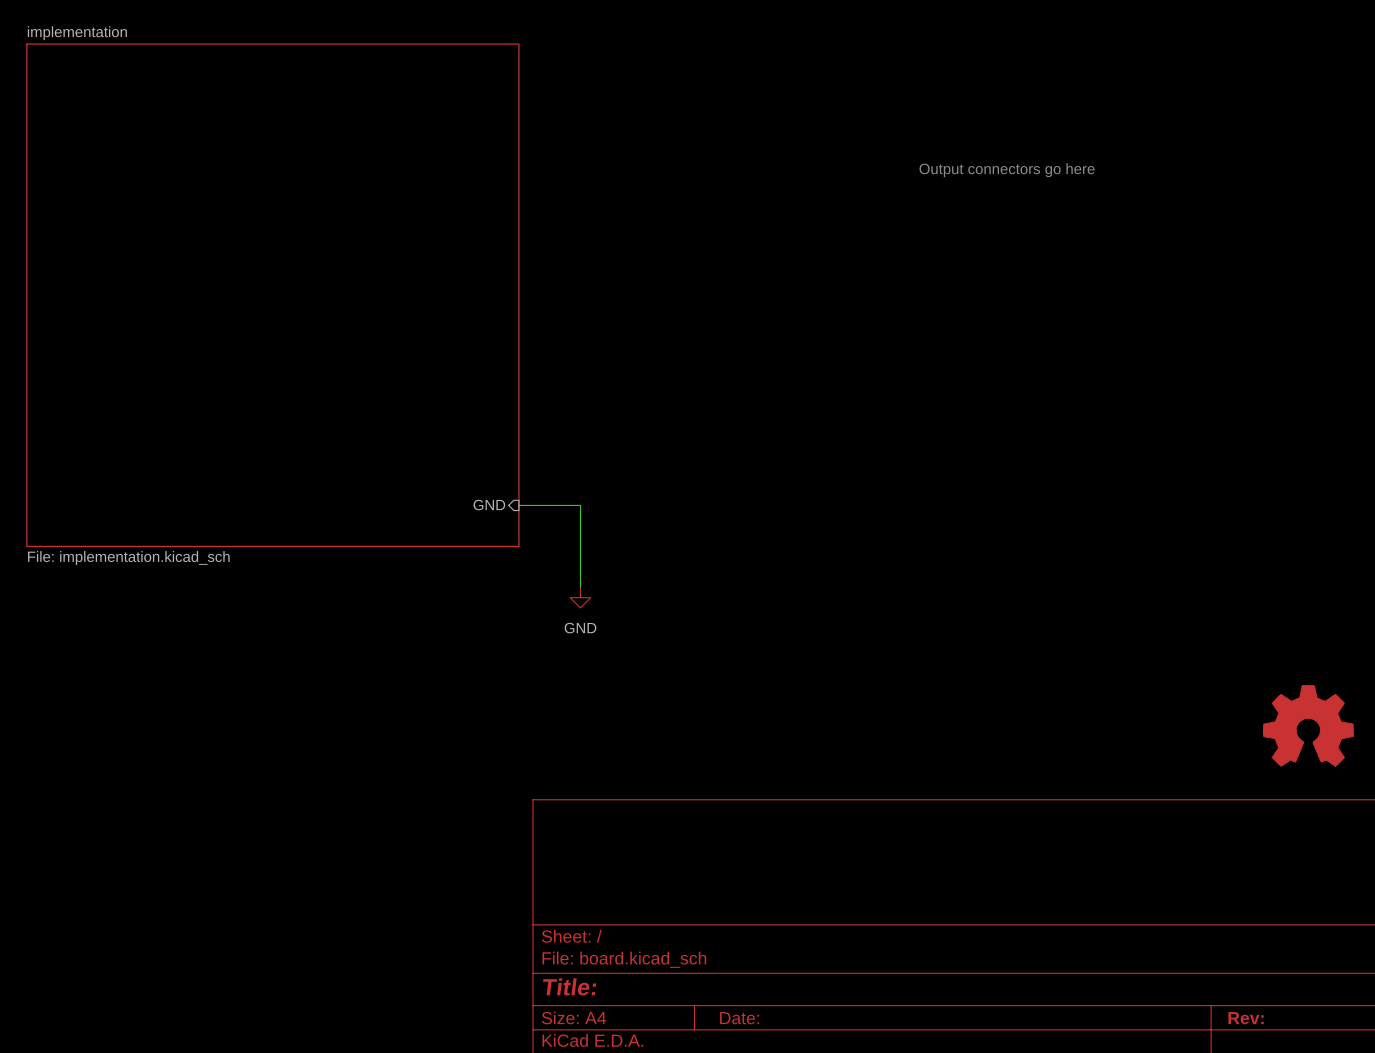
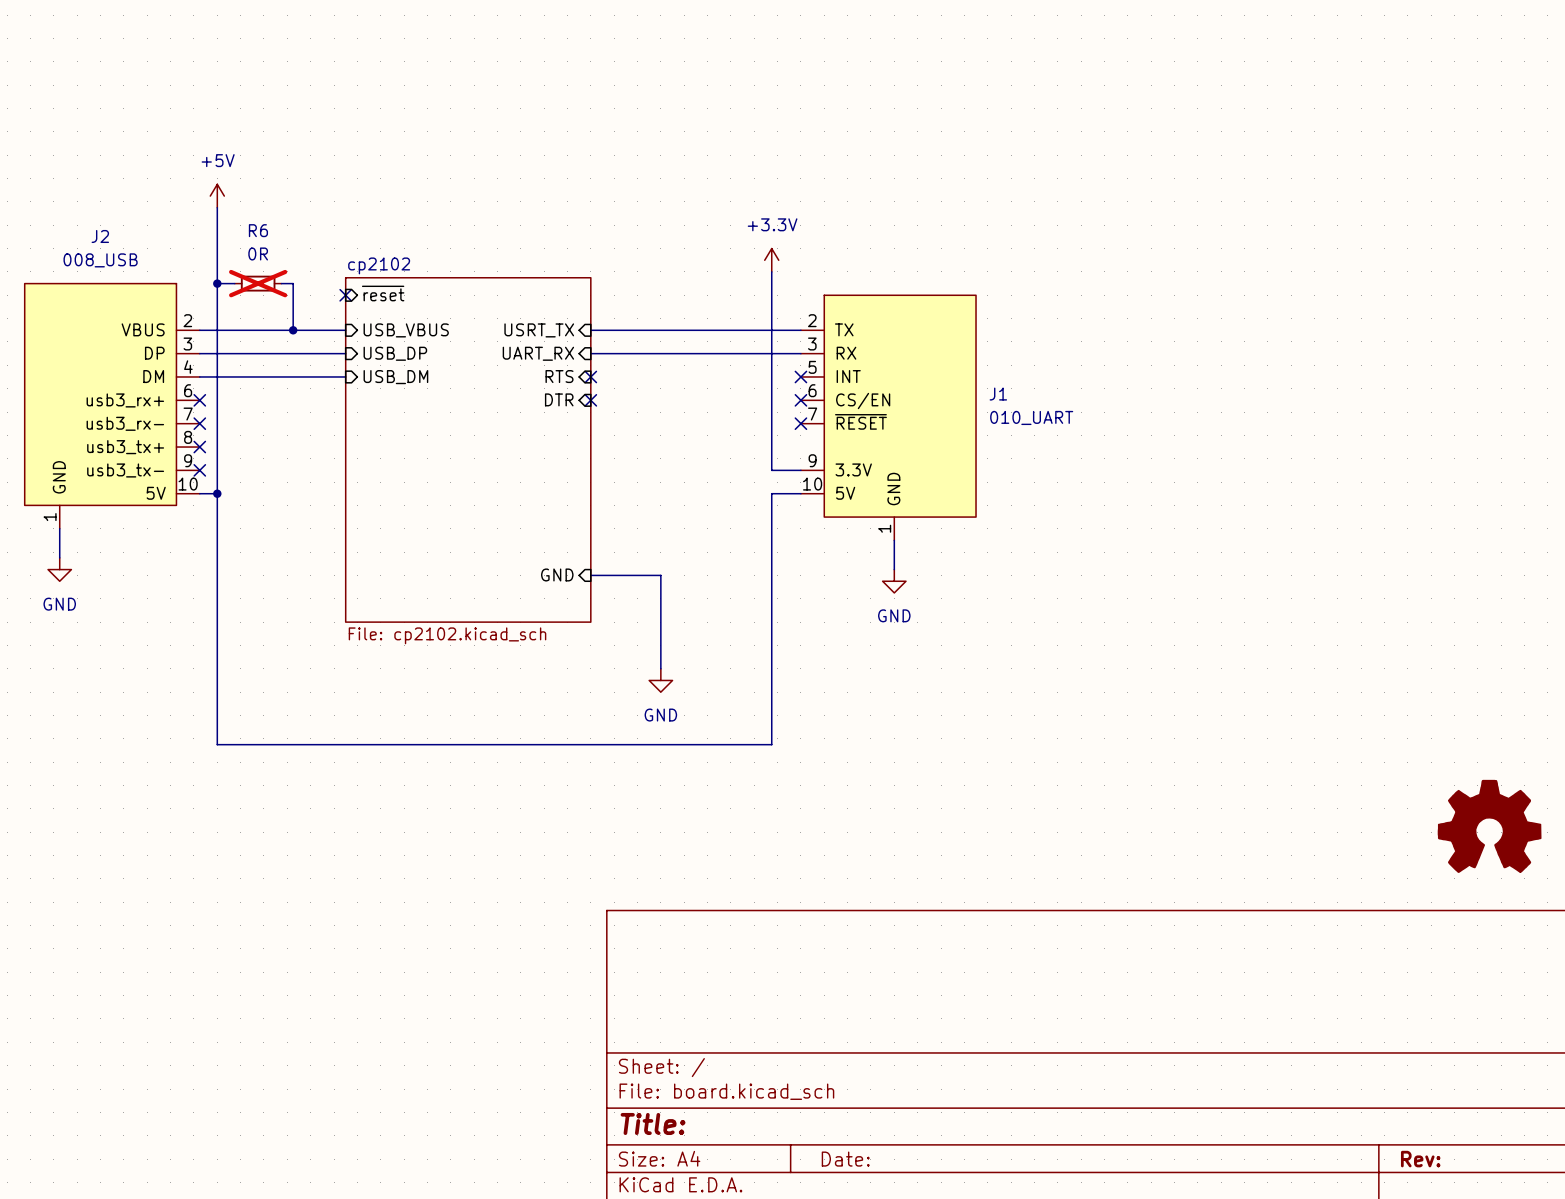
text: Output connectors go here (1007, 170) -> none
power symbol: none -> +5V (217, 196)
wire: none -> (217, 207) (217, 744) (771, 744) (771, 493) (800, 493)
power symbol: none -> +3.3V (771, 260)
wire: none -> (771, 271) (771, 470) (800, 470)
wire: none -> (217, 283) (234, 283)
junction: none -> (217, 283)
R6: none -> 0R (258, 283)
wire: none -> (281, 283) (293, 283) (293, 330)
sheet pin: none -> ~{reset} (383, 293)
no-connect mark: none -> (345, 295)
wire: none -> (199, 330) (345, 330)
junction: none -> (293, 330)
wire: none -> (590, 330) (800, 330)
sheet pin: none -> USB_VBUS (406, 330)
sheet pin: none -> USRT_TX (539, 330)
sheet implementation: File: implementation.kicad_sch (272, 295) -> none
wire: none -> (199, 353) (345, 353)
wire: none -> (590, 353) (800, 353)
sheet pin: none -> USB_DP (395, 353)
sheet pin: none -> UART_RX (538, 353)
sheet pin: none -> RTS (559, 376)
wire: none -> (199, 376) (345, 376)
no-connect mark: none -> (590, 376)
no-connect mark: none -> (800, 376)
sheet pin: none -> USB_DM (395, 377)
no-connect mark: none -> (199, 400)
sheet pin: none -> DTR (559, 399)
no-connect mark: none -> (590, 400)
no-connect mark: none -> (800, 400)
J2: none -> 008_USB (112, 406)
J1: none -> 010_UART (888, 417)
no-connect mark: none -> (199, 423)
no-connect mark: none -> (800, 423)
no-connect mark: none -> (199, 447)
sheet cp2102: none -> File: cp2102.kicad_sch (468, 449)
no-connect mark: none -> (199, 470)
wire: none -> (199, 493) (217, 493)
junction: none -> (217, 493)
wire: none -> (59, 528) (59, 557)
wire: none -> (894, 540) (894, 569)
power symbol: none -> GND (59, 569)
power symbol: none -> GND (894, 581)

